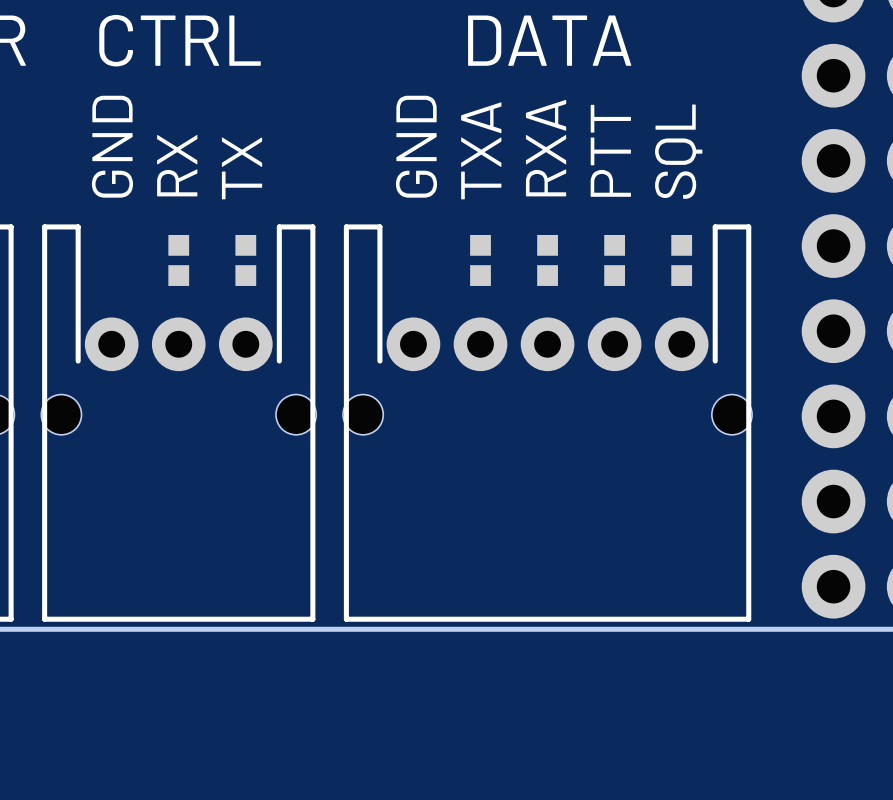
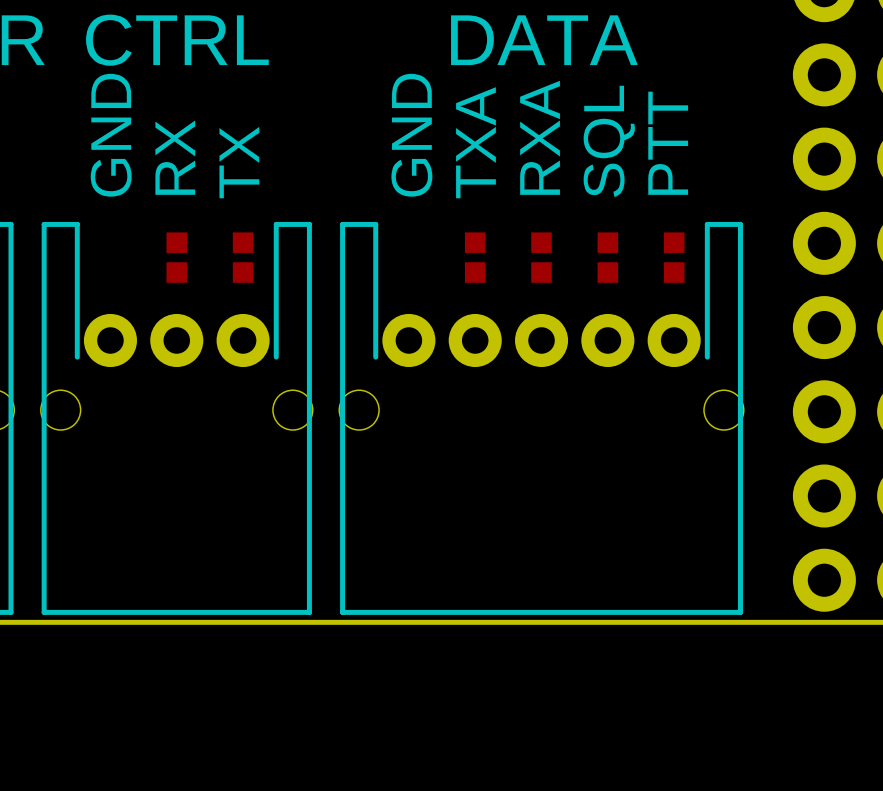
text: PTT (610, 150) -> SQL (609, 141)
text: SQL (678, 151) -> PTT (668, 143)

